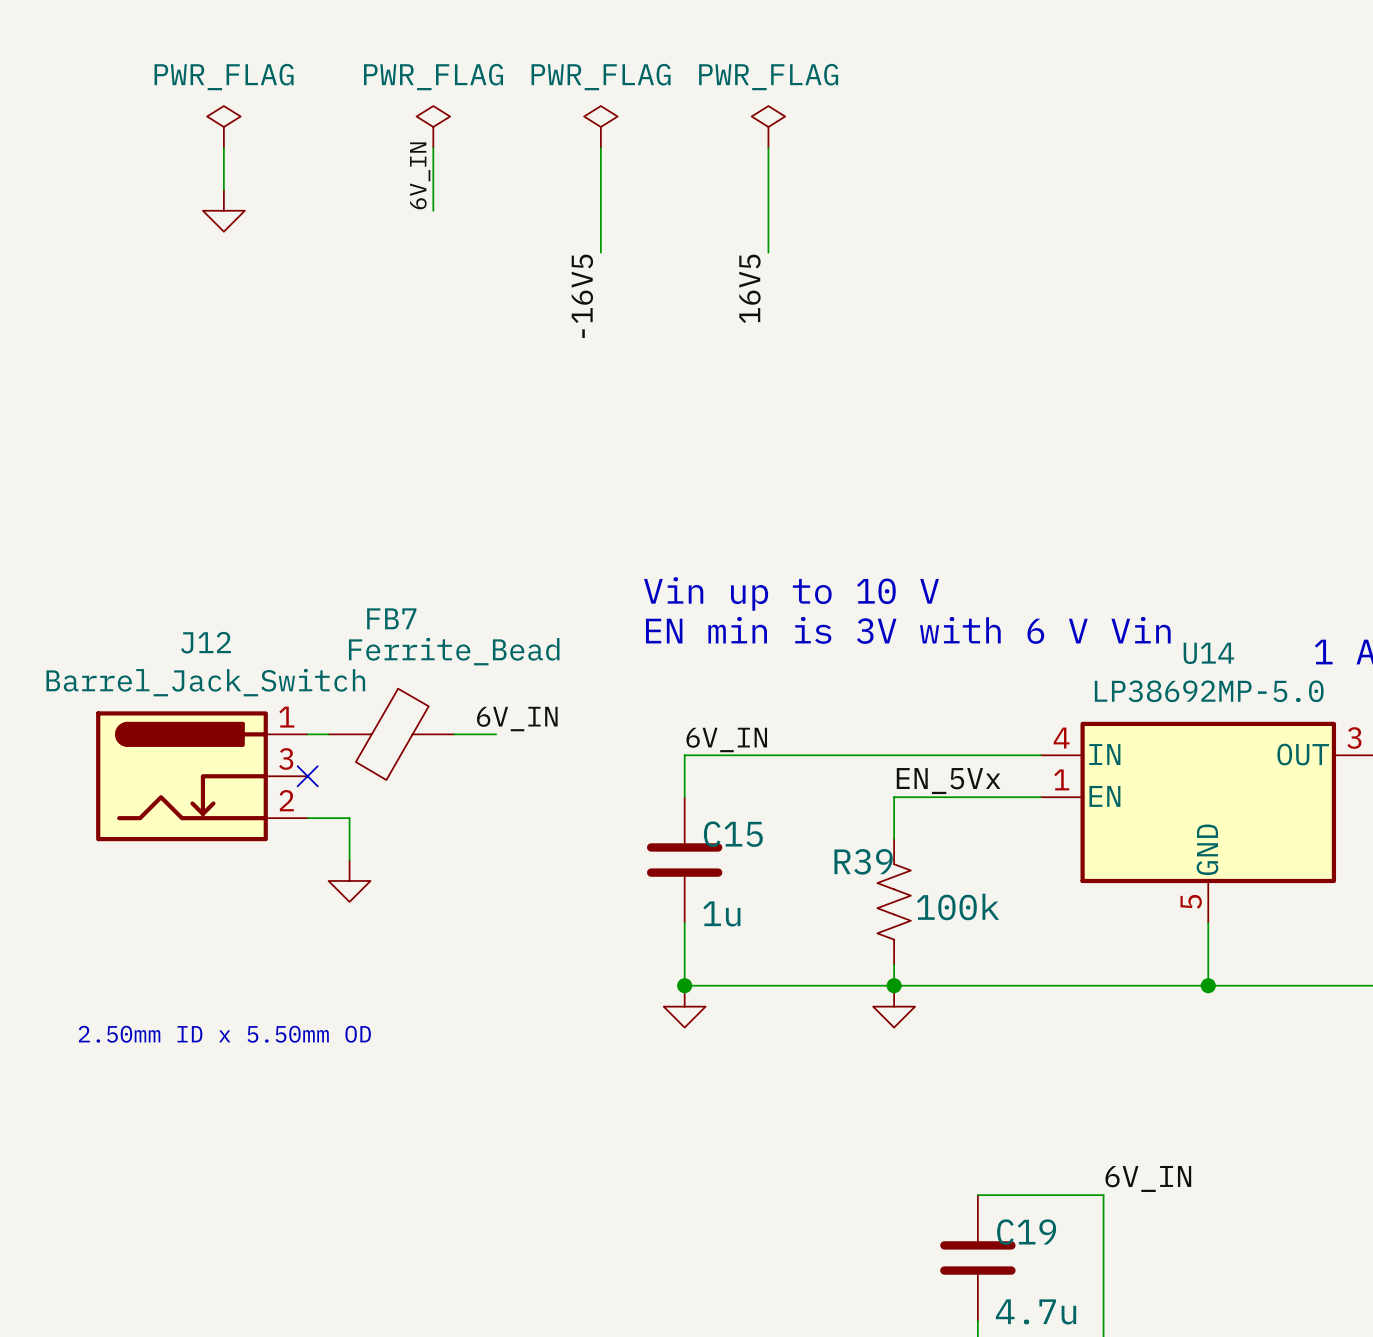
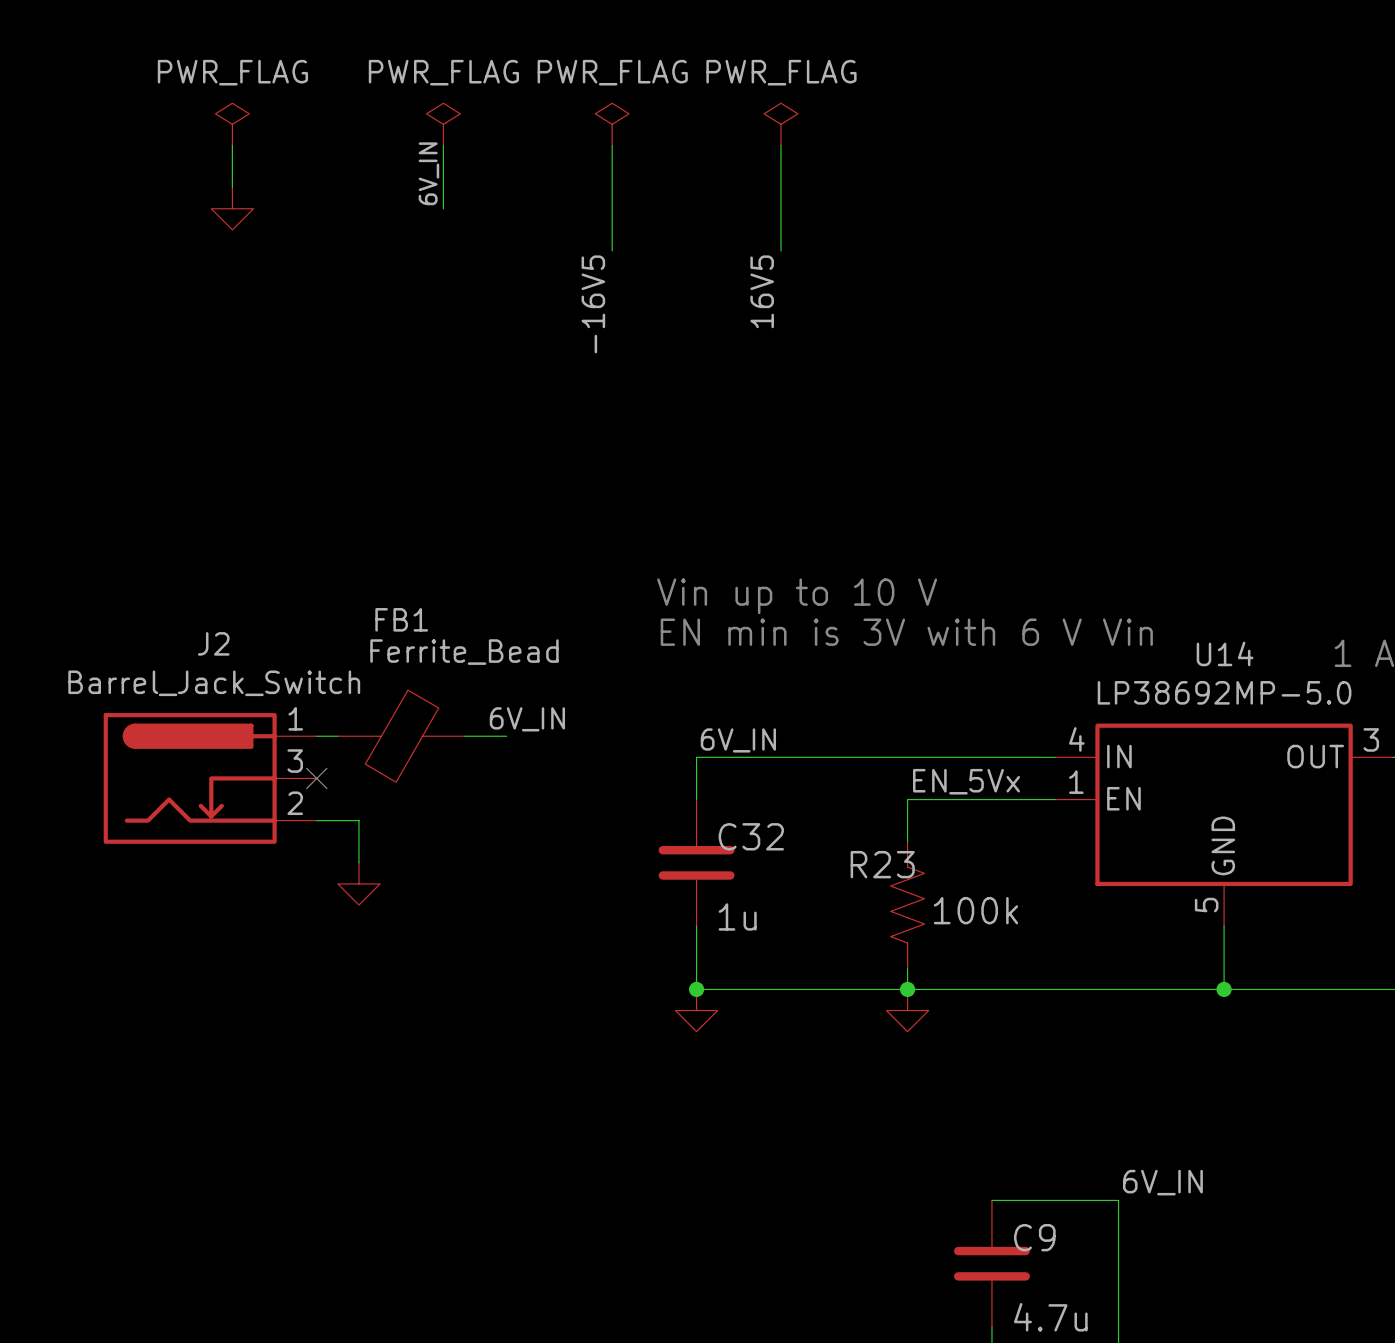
FB7 name: FB7 (391, 618) -> FB1 (401, 619)
J12 name: J12 (206, 642) -> J2 (213, 643)
C15 name: C15 (733, 834) -> C32 (751, 836)
R39 name: R39 (863, 861) -> R23 (882, 864)
text: 2.50mm ID x 5.50mm OD (224, 1034) -> none
C19 name: C19 (1026, 1232) -> C9 (1034, 1237)

